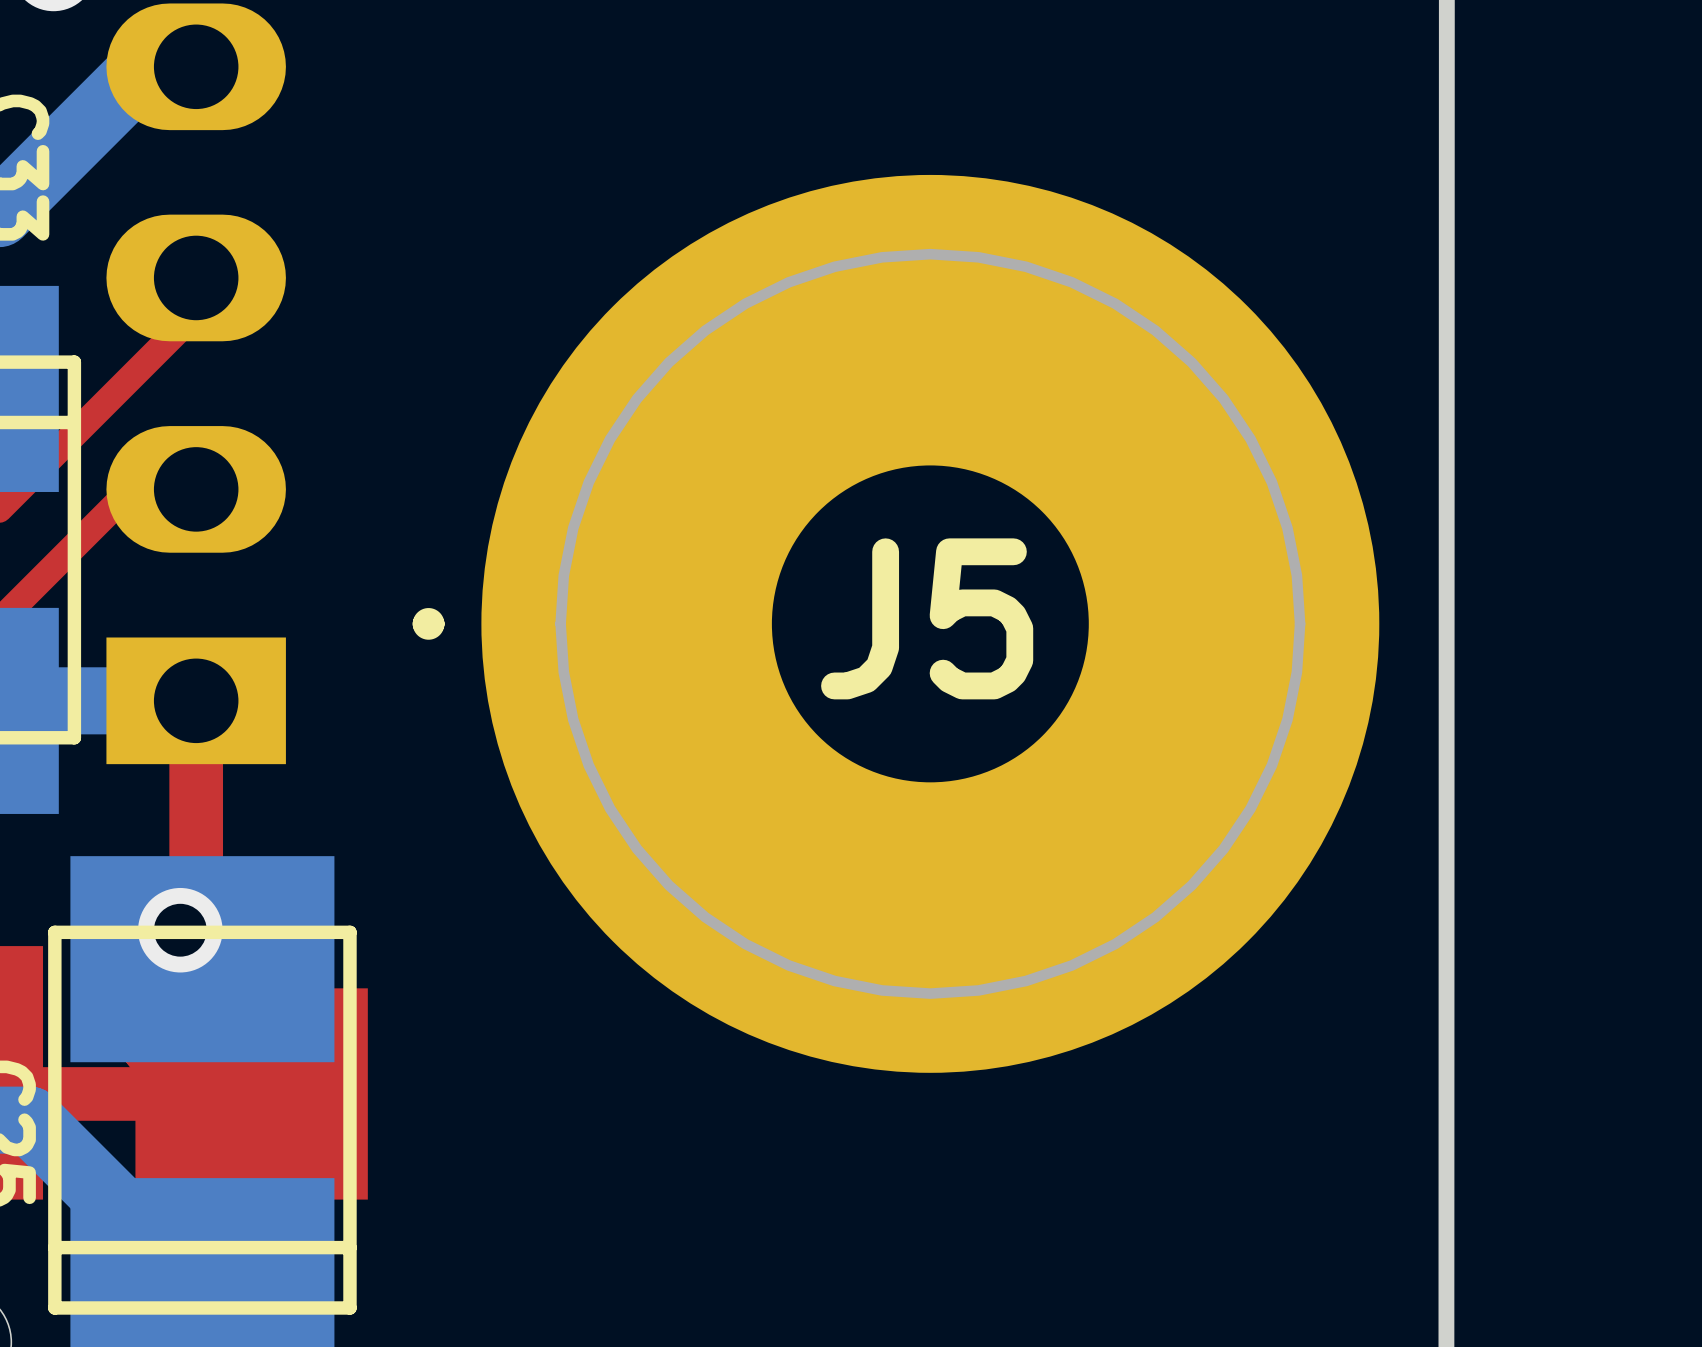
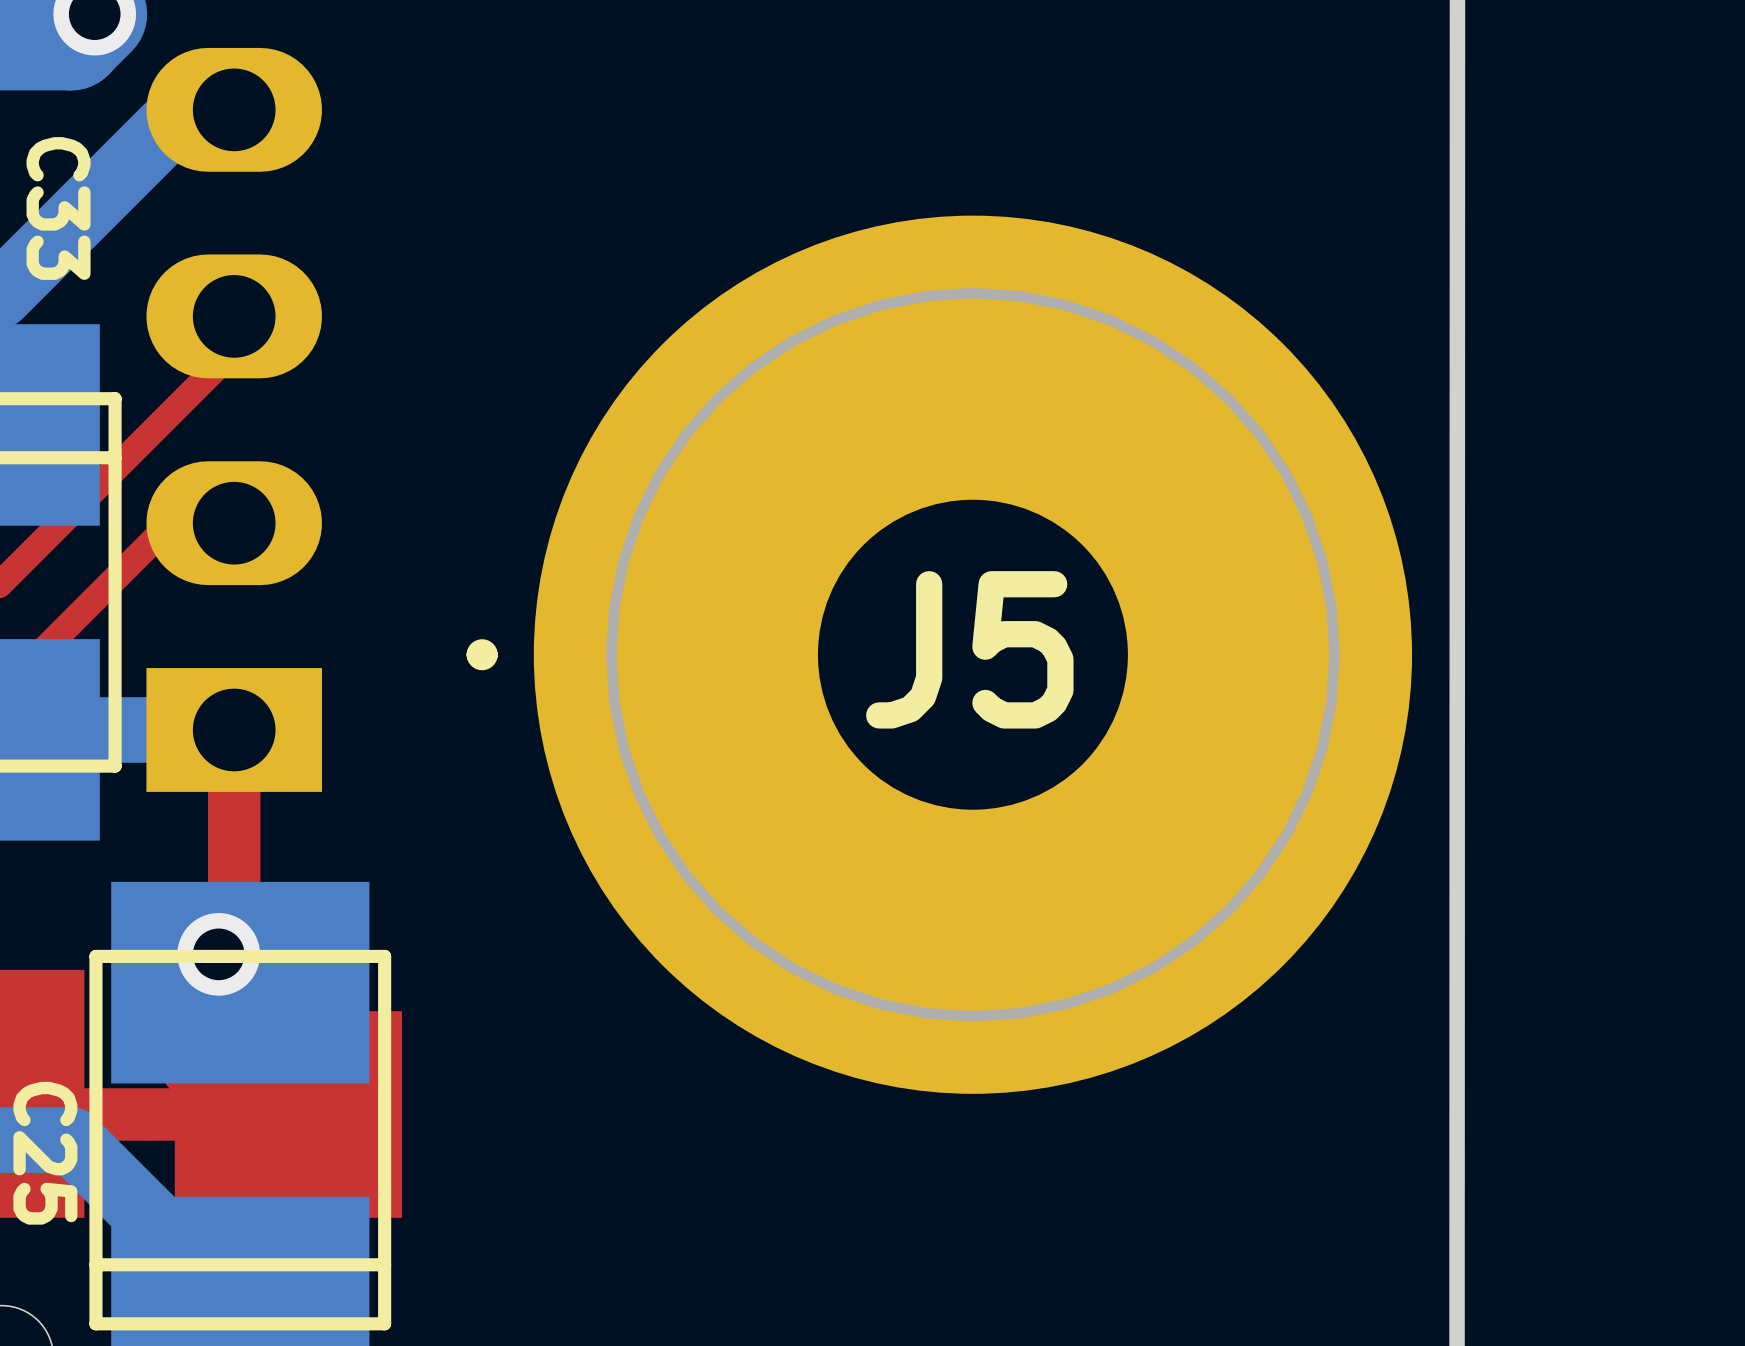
J5 position: (896, 623) -> (939, 654)

